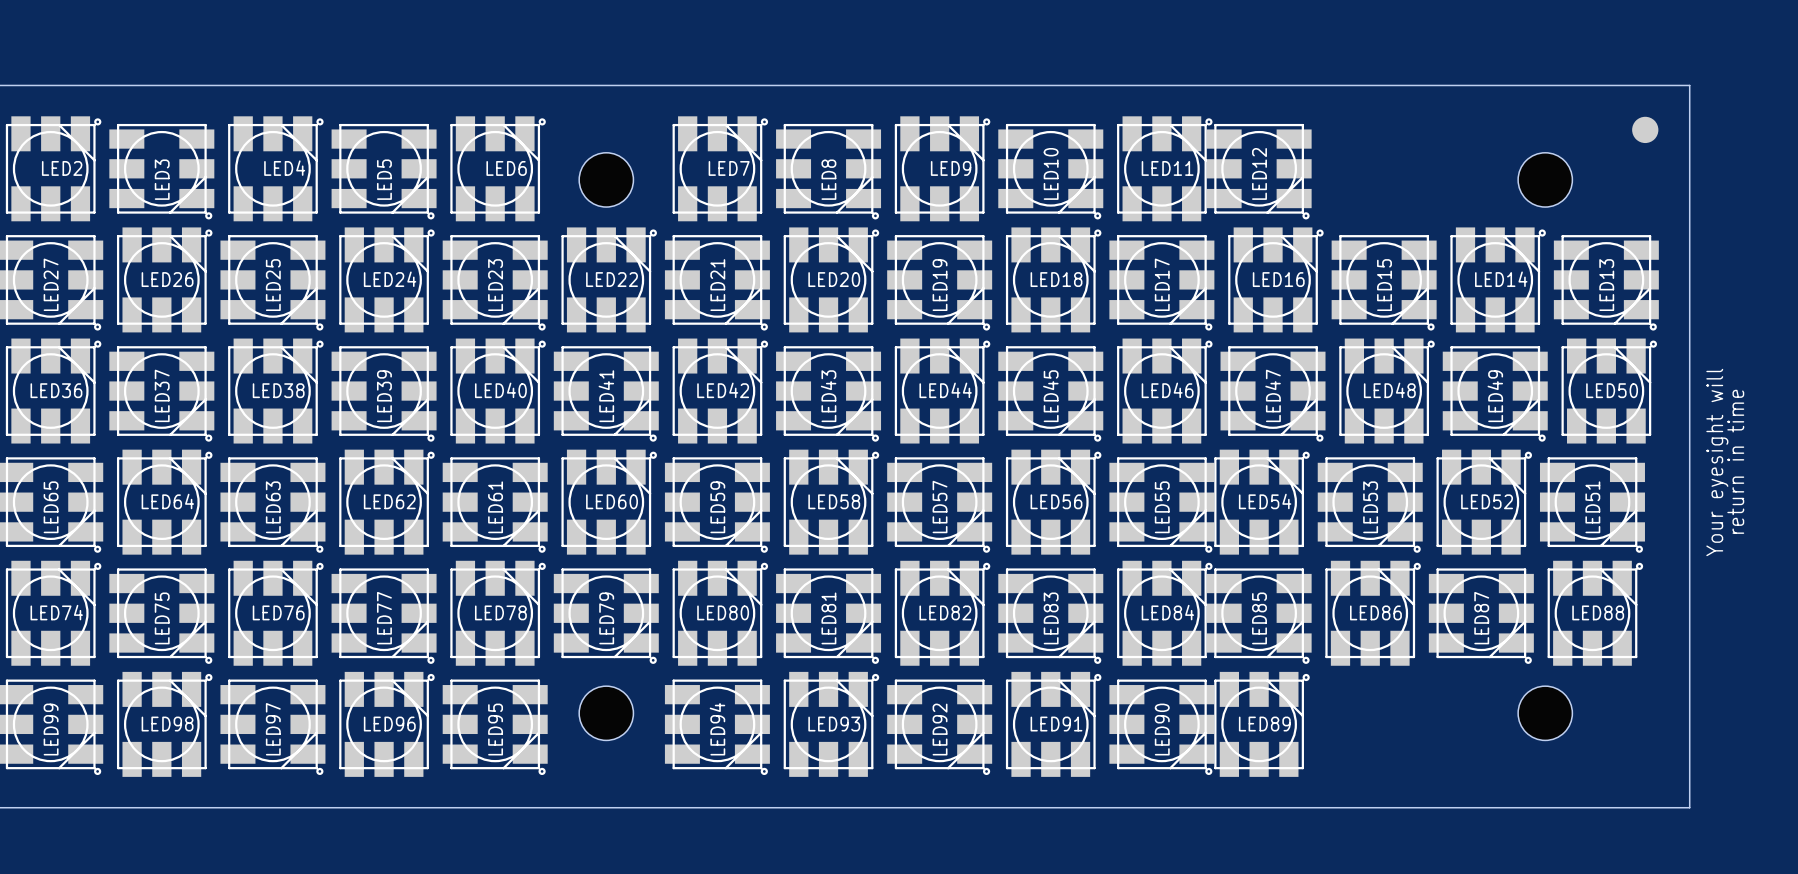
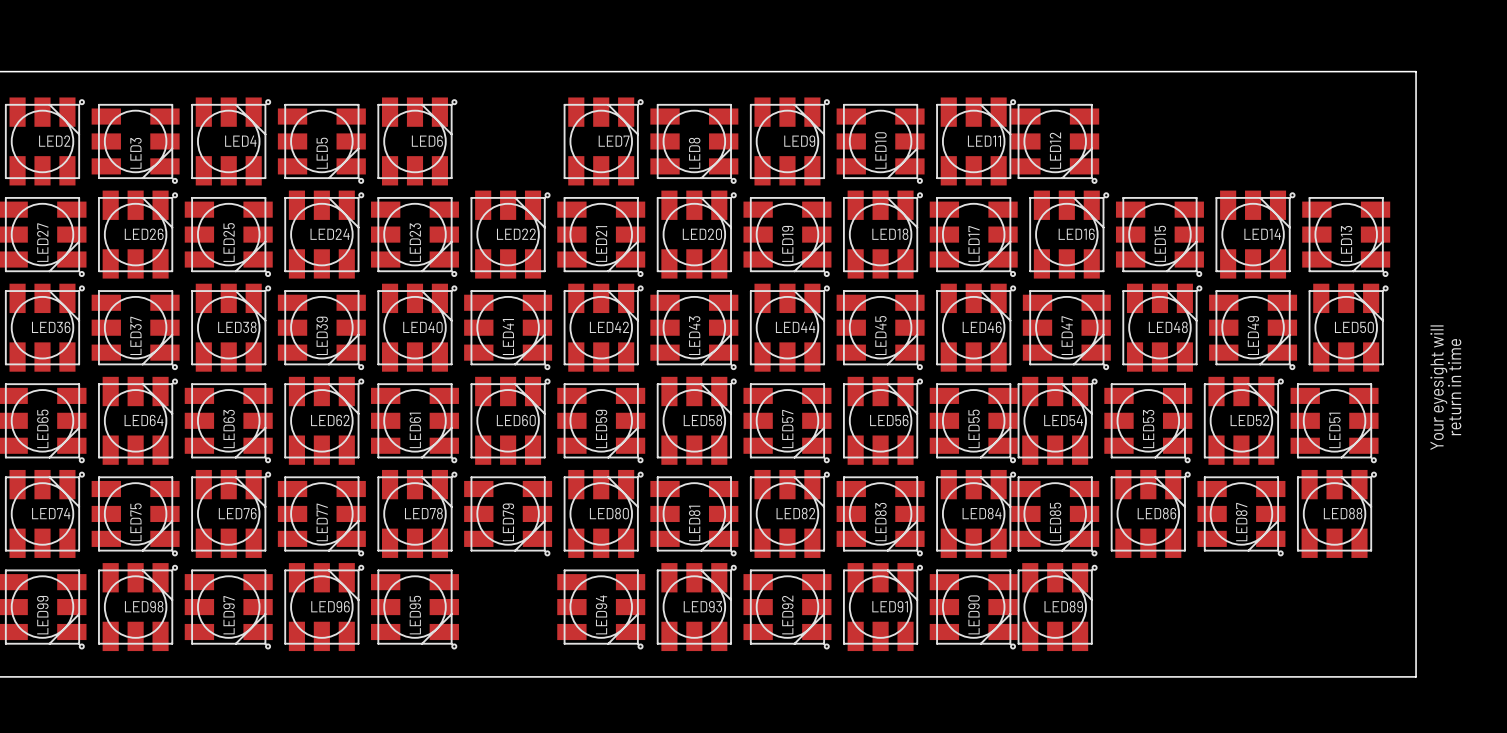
part: (1645, 129) -> none
hole: (606, 179) -> none
hole: (1545, 179) -> none
hole: (606, 713) -> none
hole: (1545, 713) -> none

